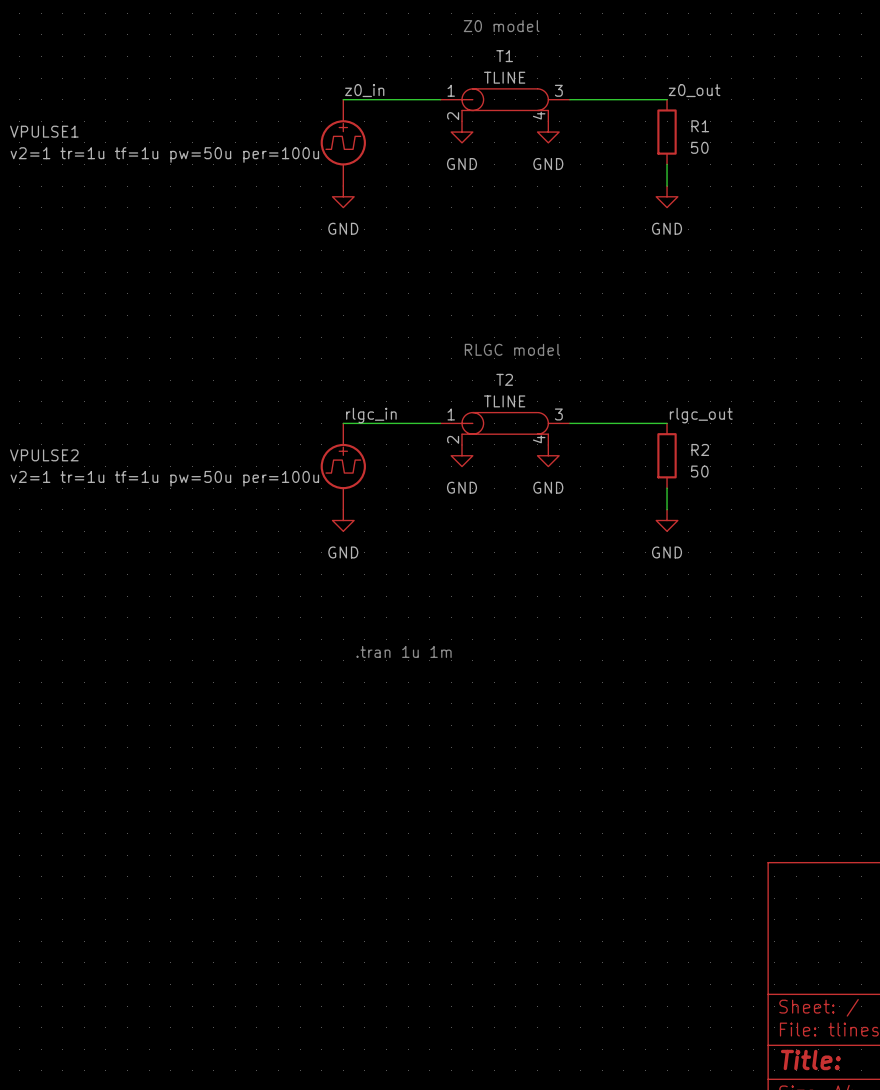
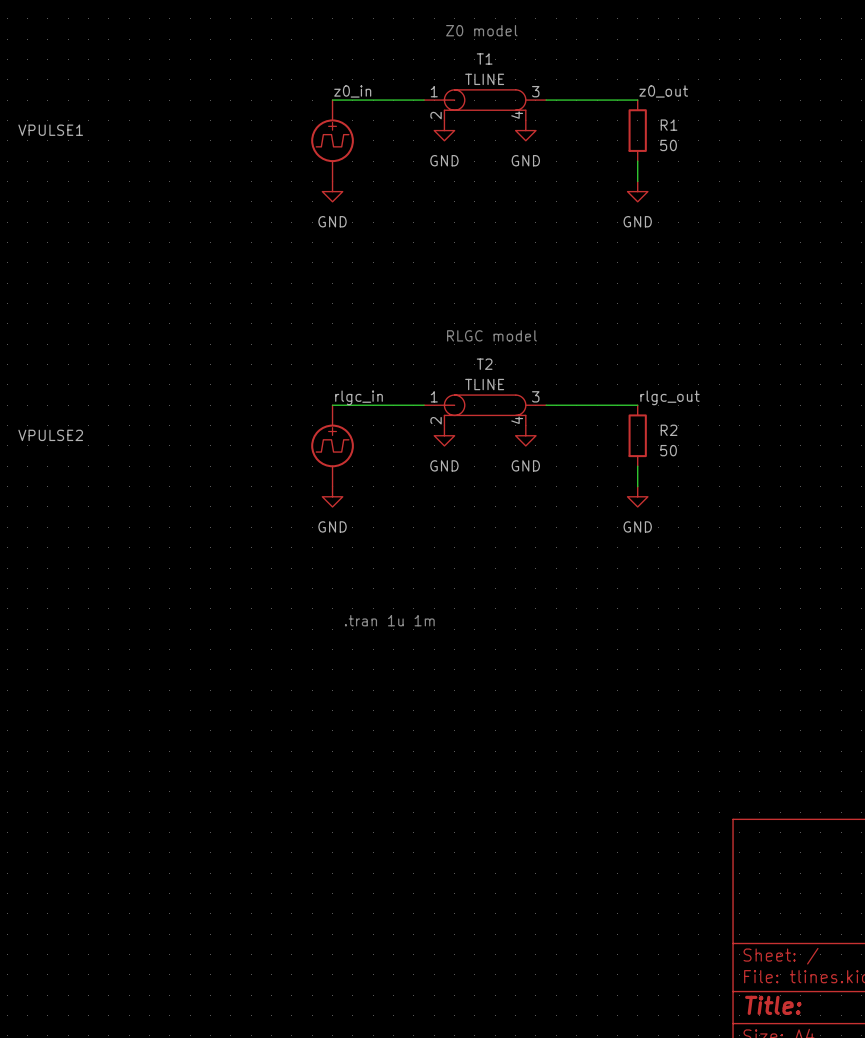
VPULSE1 value: v2=1 tr=1u tf=1u pw=50u per=100u (164, 155) -> none
VPULSE2 value: v2=1 tr=1u tf=1u pw=50u per=100u (164, 478) -> none

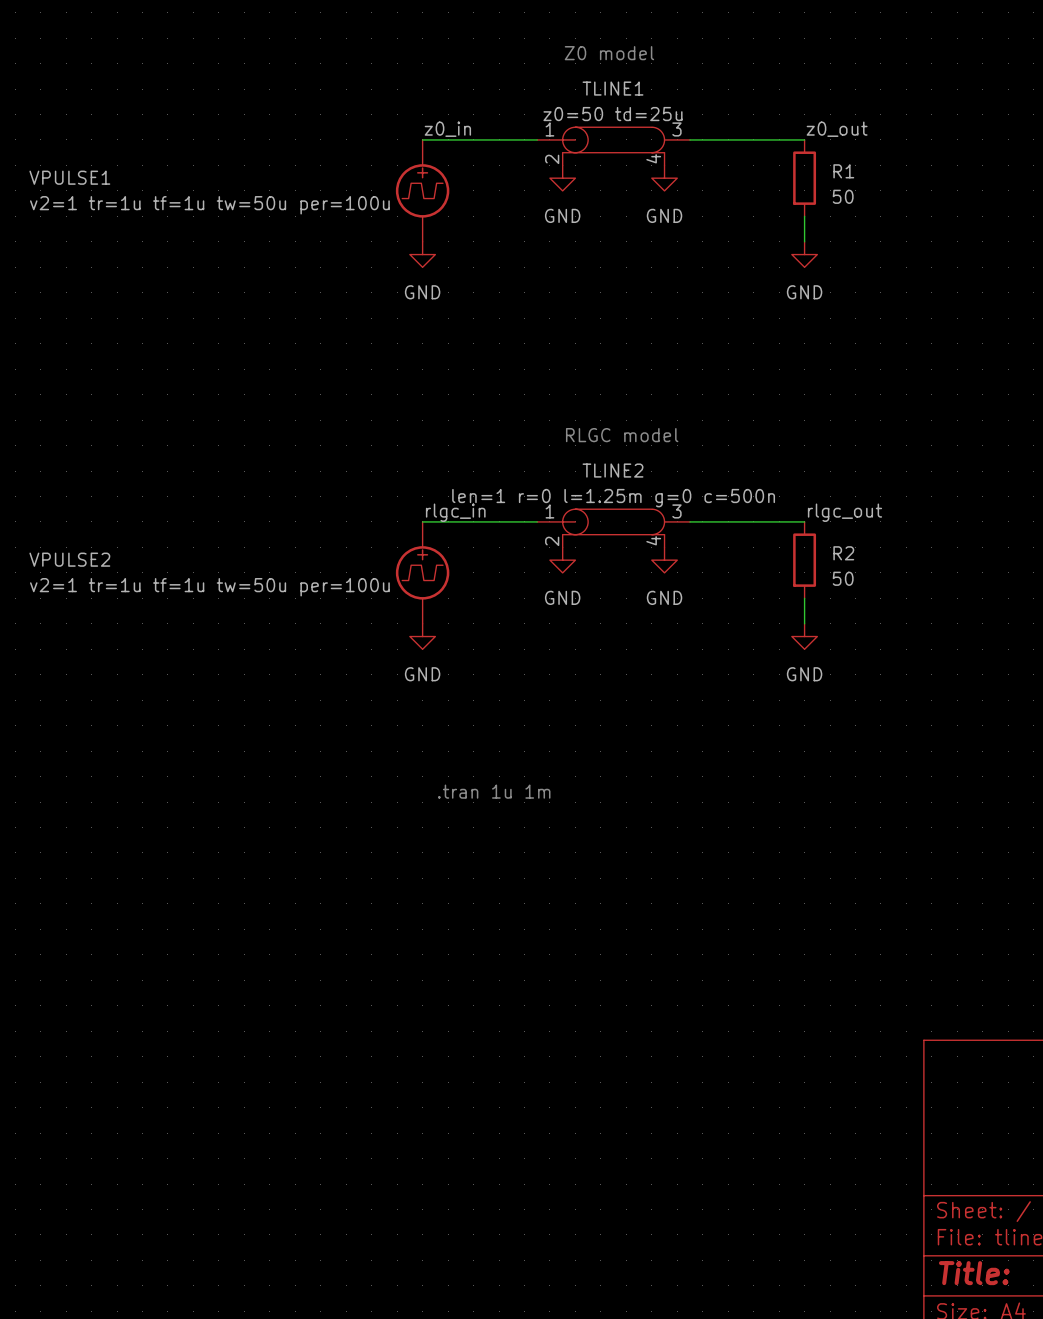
T1 name: T1 (484, 59) -> TLINE1 (613, 88)
T1 value: TLINE (484, 79) -> z0=50 td=25u (613, 114)
VPULSE1 value: none -> v2=1 tr=1u tf=1u tw=50u per=100u (209, 205)
T2 name: T2 (484, 364) -> TLINE2 (613, 470)
T2 value: TLINE (484, 384) -> len=1 r=0 l=1.25m g=0 c=500n (613, 498)
VPULSE2 value: none -> v2=1 tr=1u tf=1u tw=50u per=100u (209, 587)

